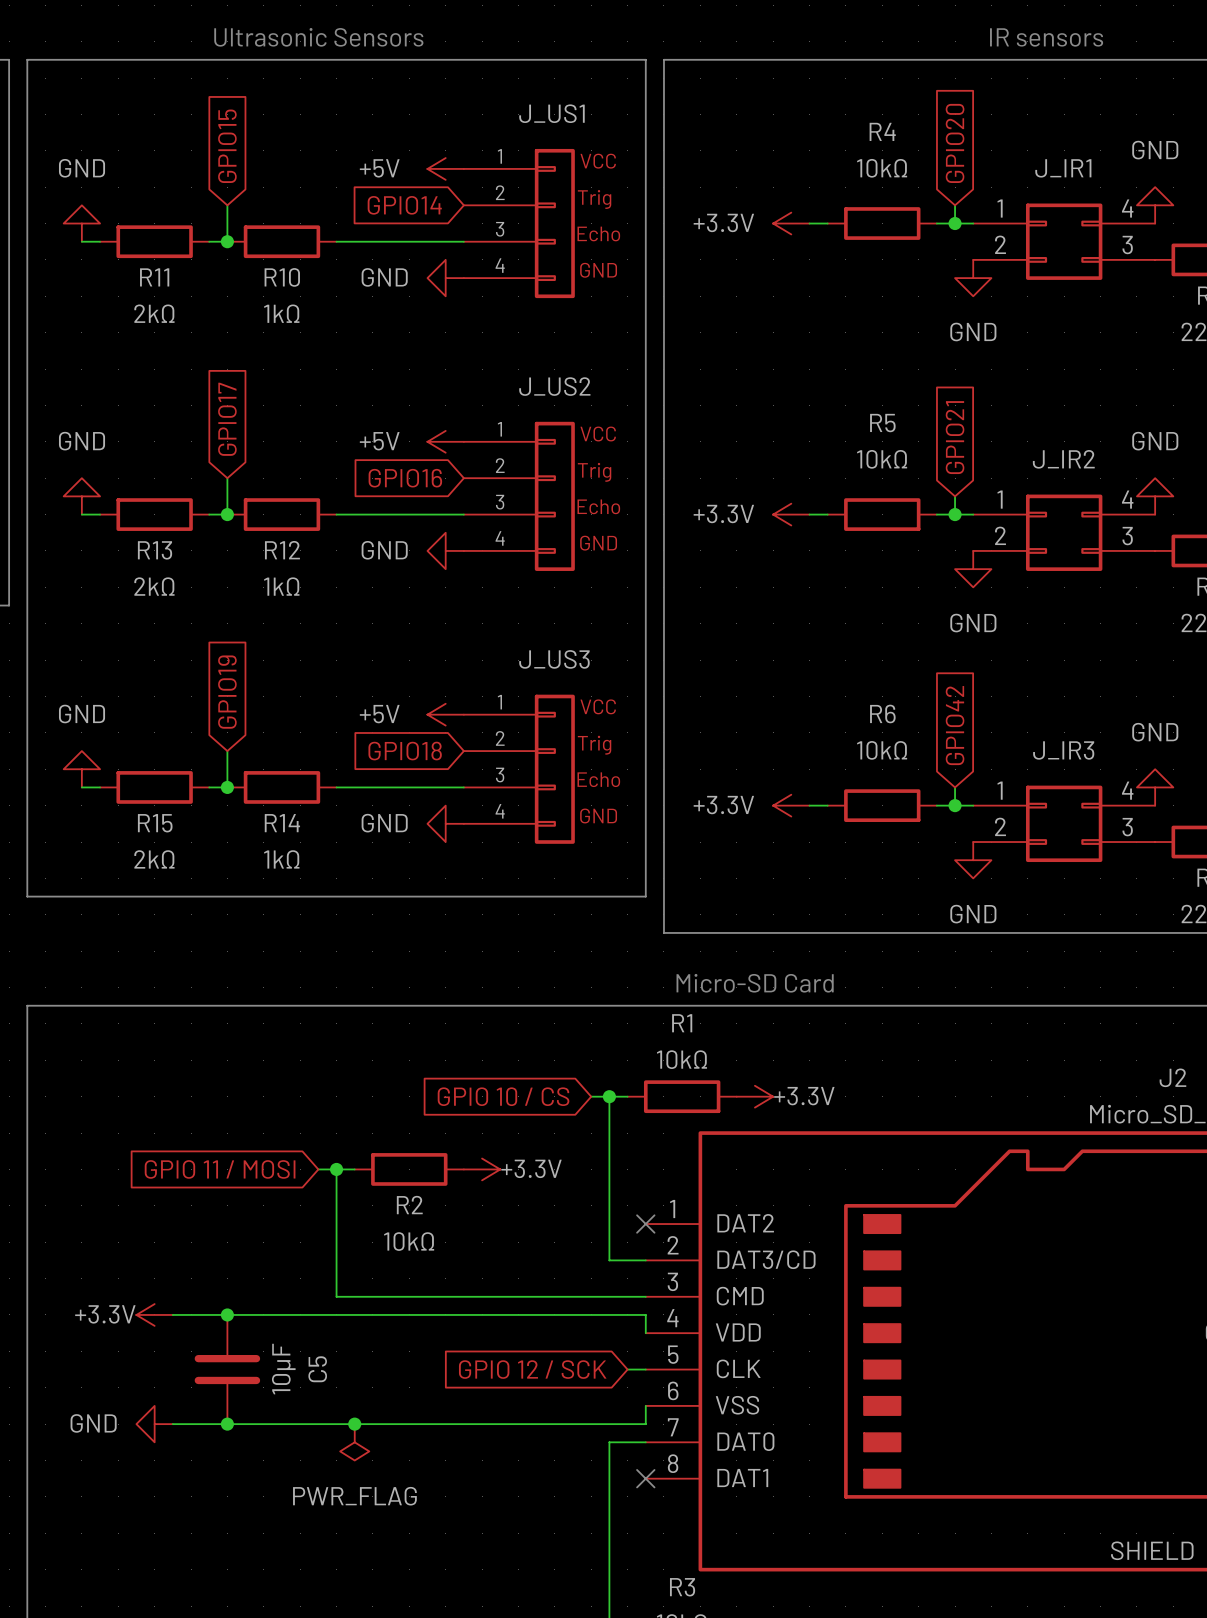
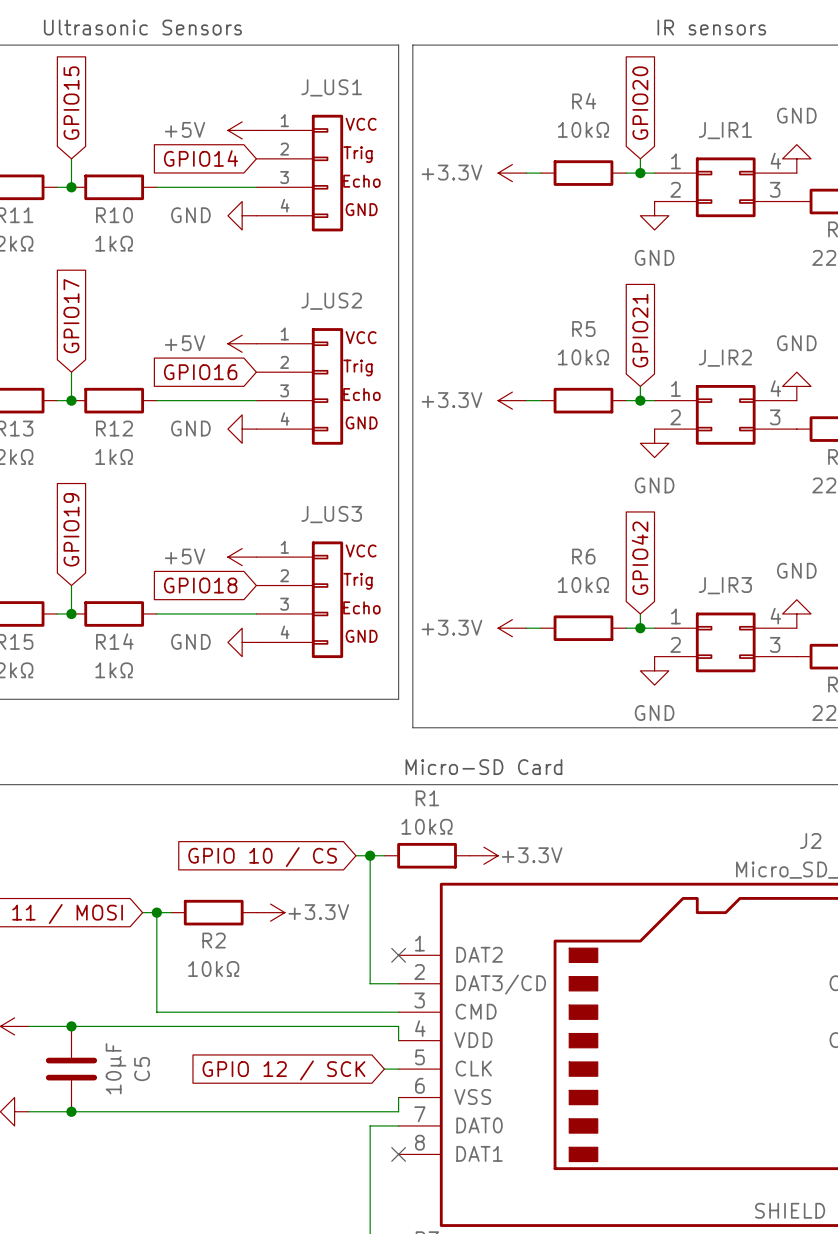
junction: (354, 1424) -> none
power symbol: PWR_FLAG (354, 1442) -> none

